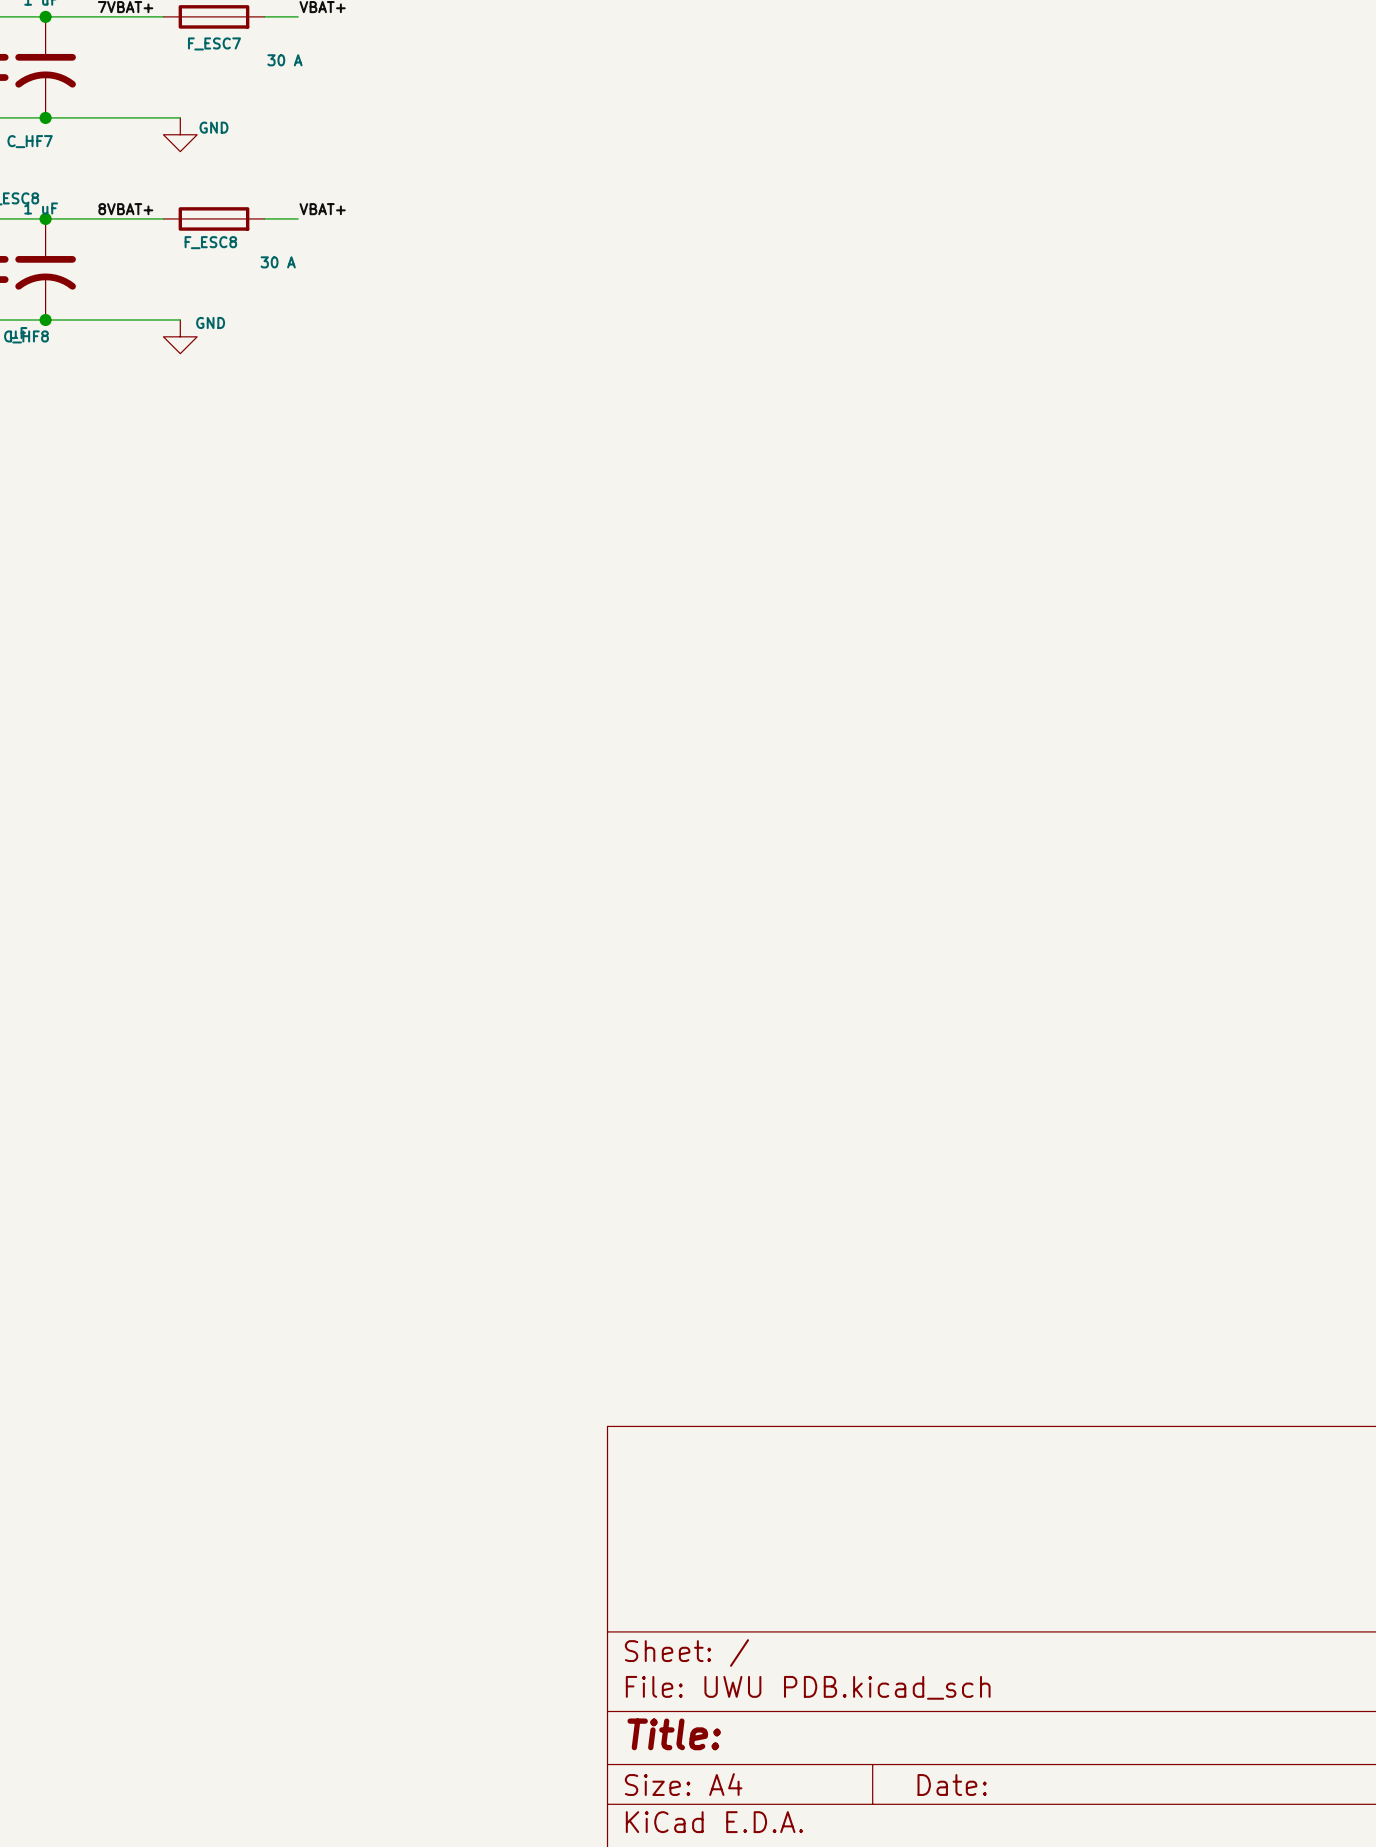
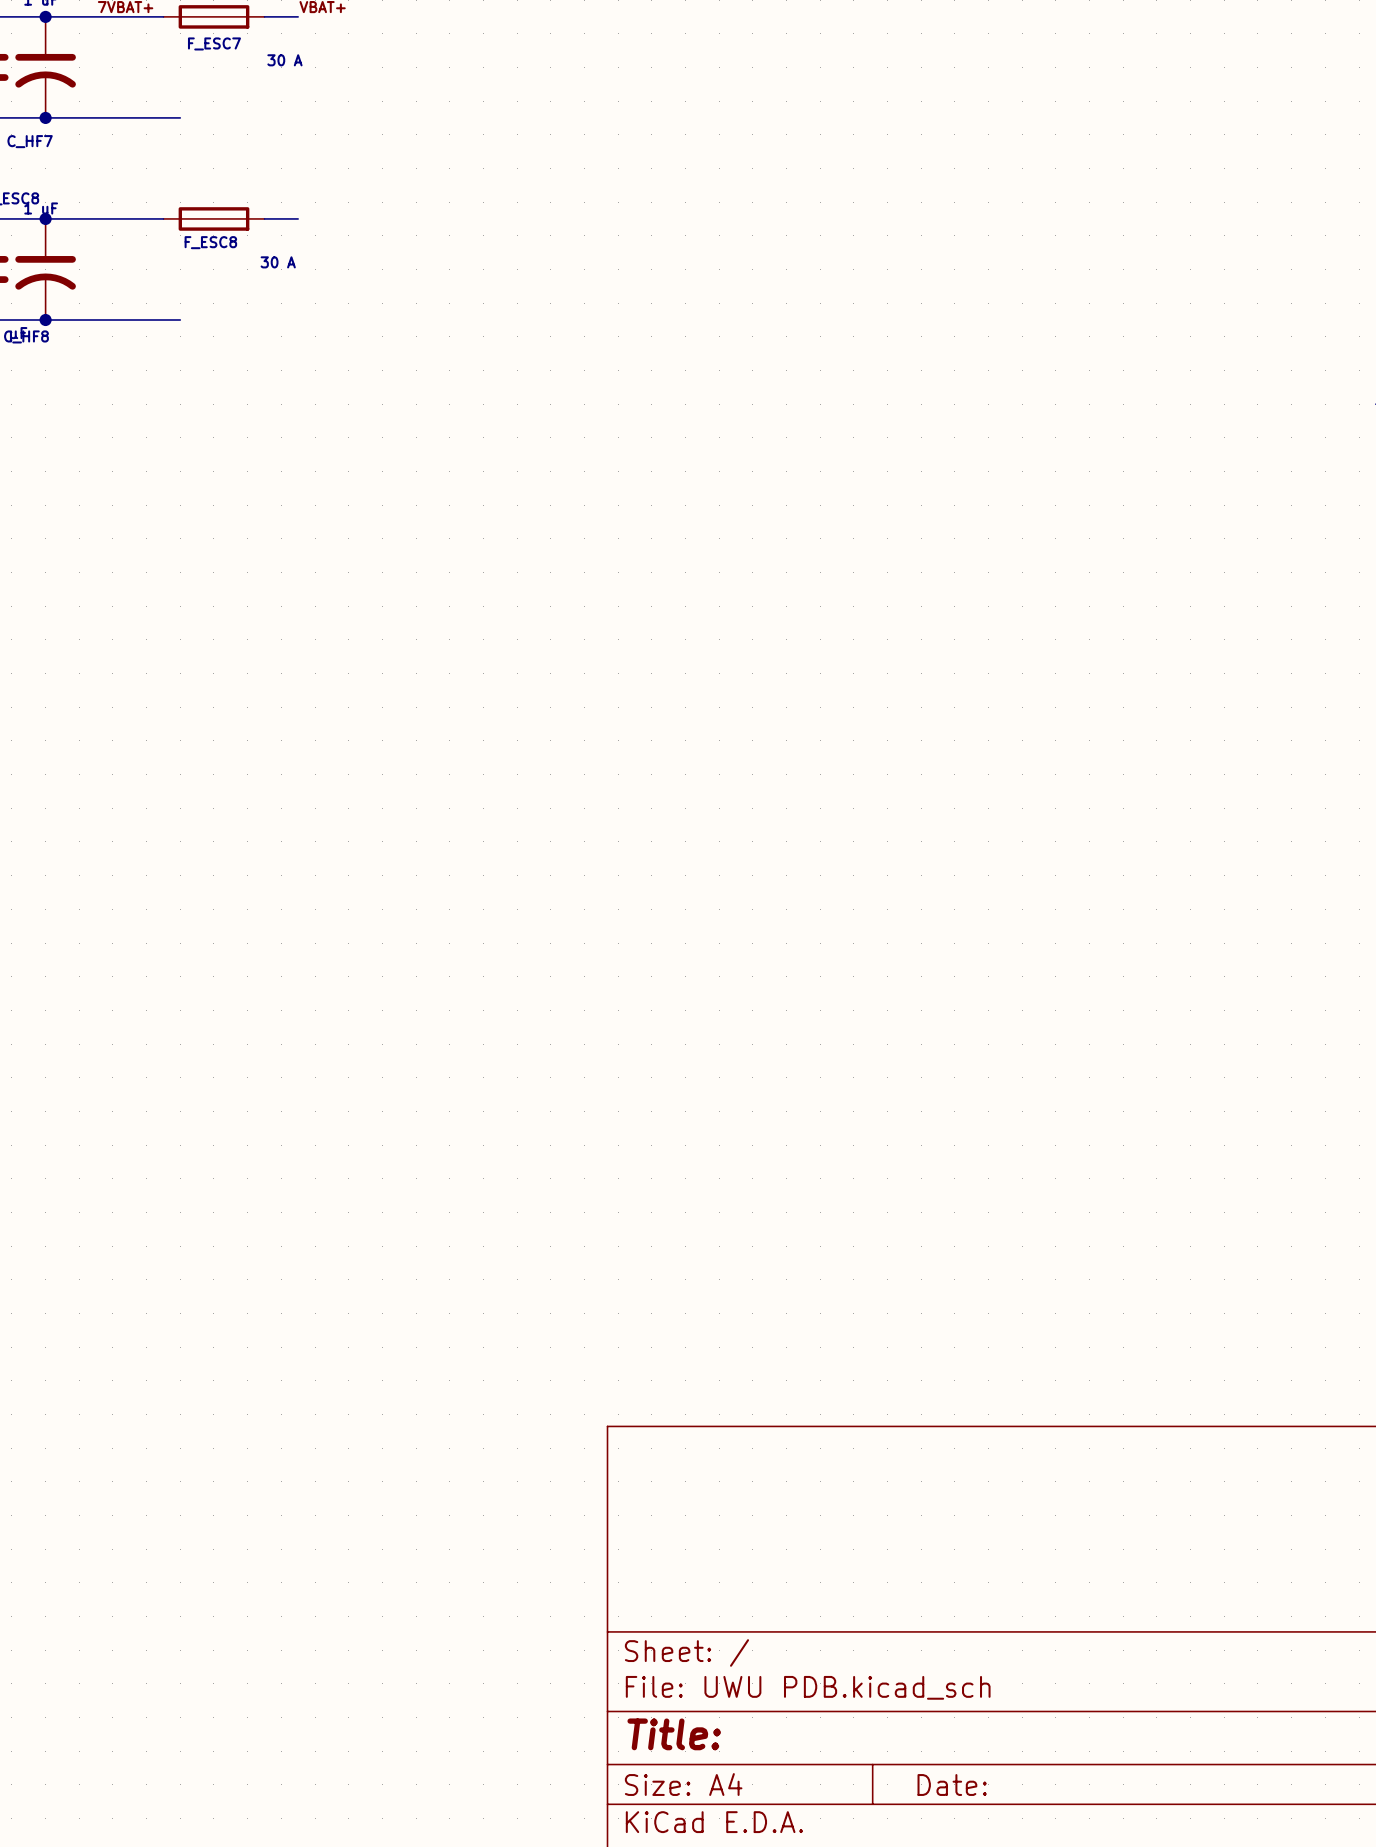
power symbol: GND (180, 134) -> none
label: 8VBAT+ (125, 209) -> none
label: VBAT+ (322, 209) -> none
power symbol: GND (180, 336) -> none

